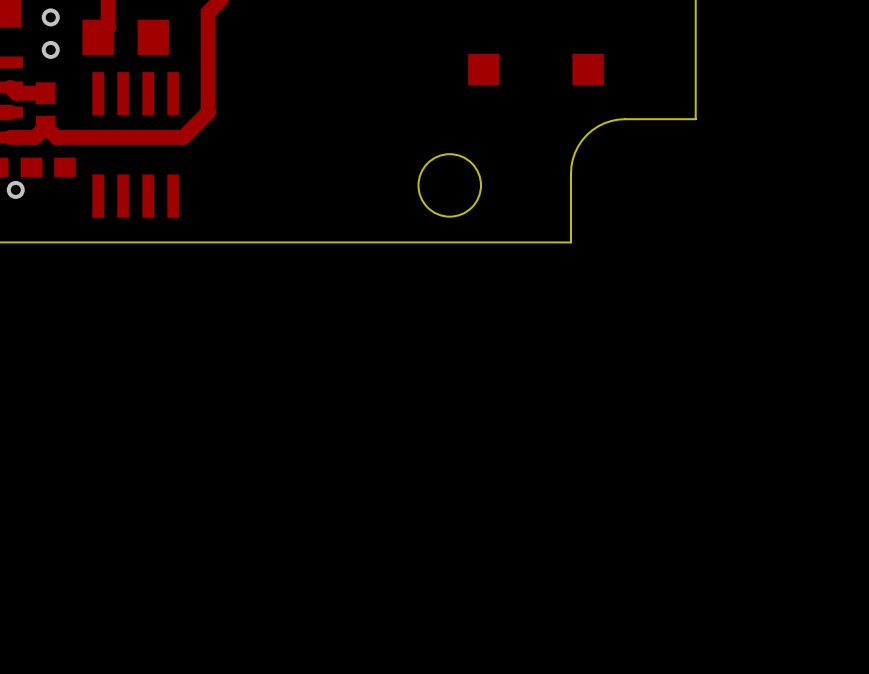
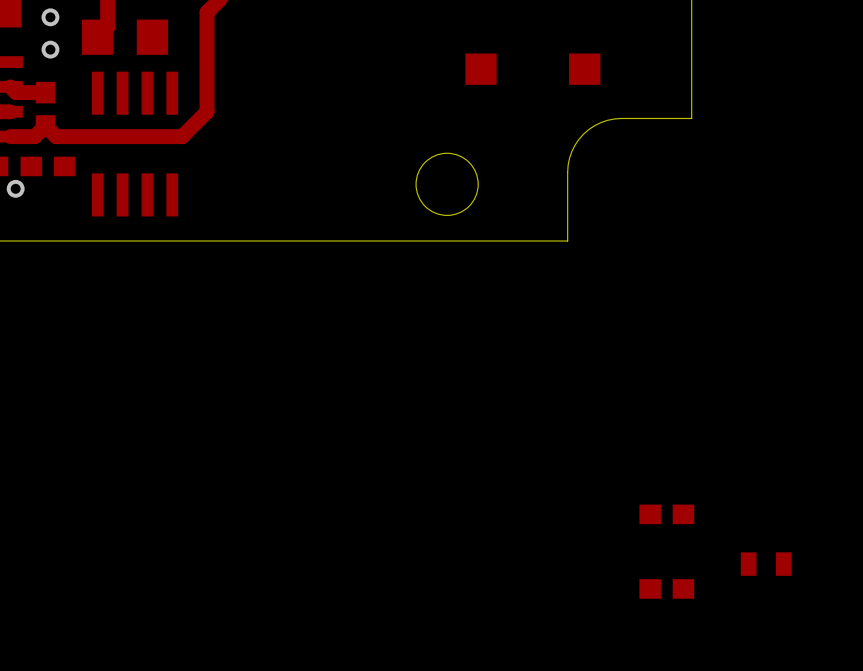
part: none -> (666, 514)
part: none -> (766, 564)
part: none -> (666, 588)

